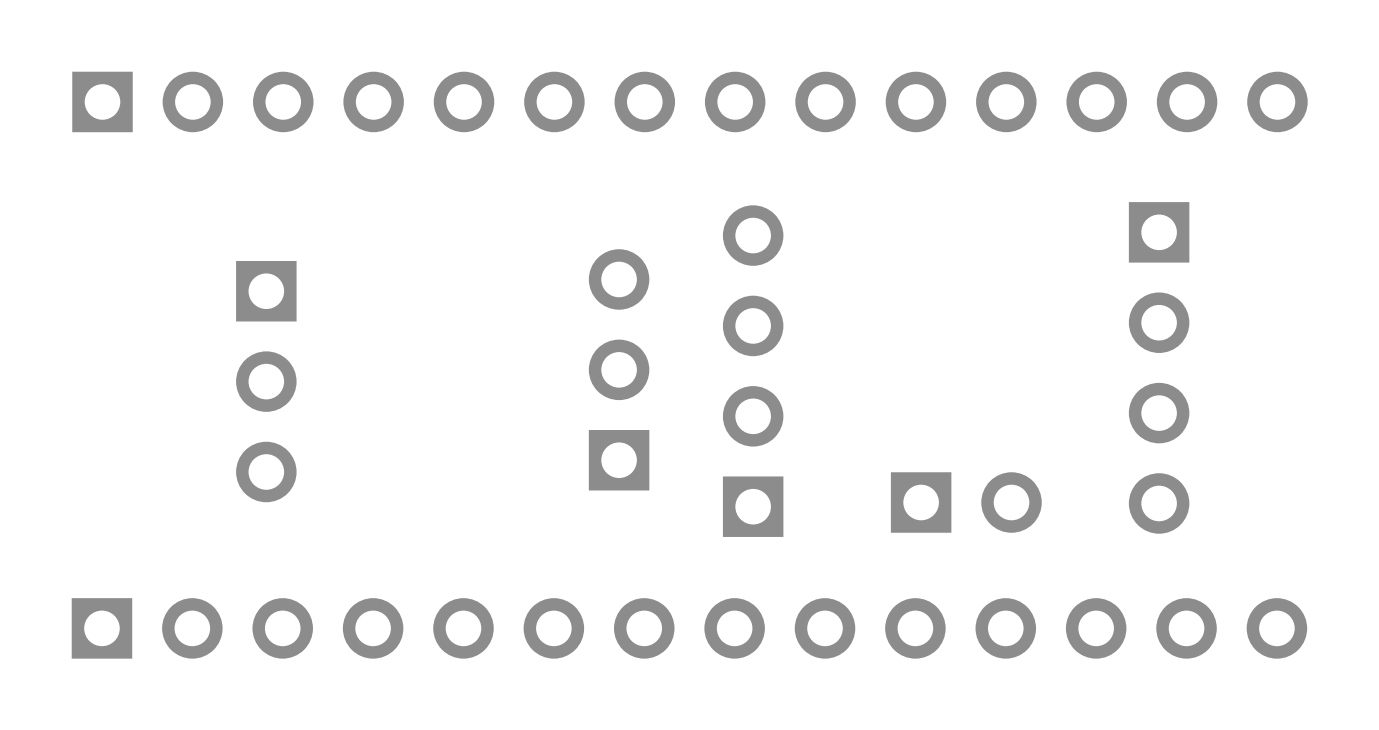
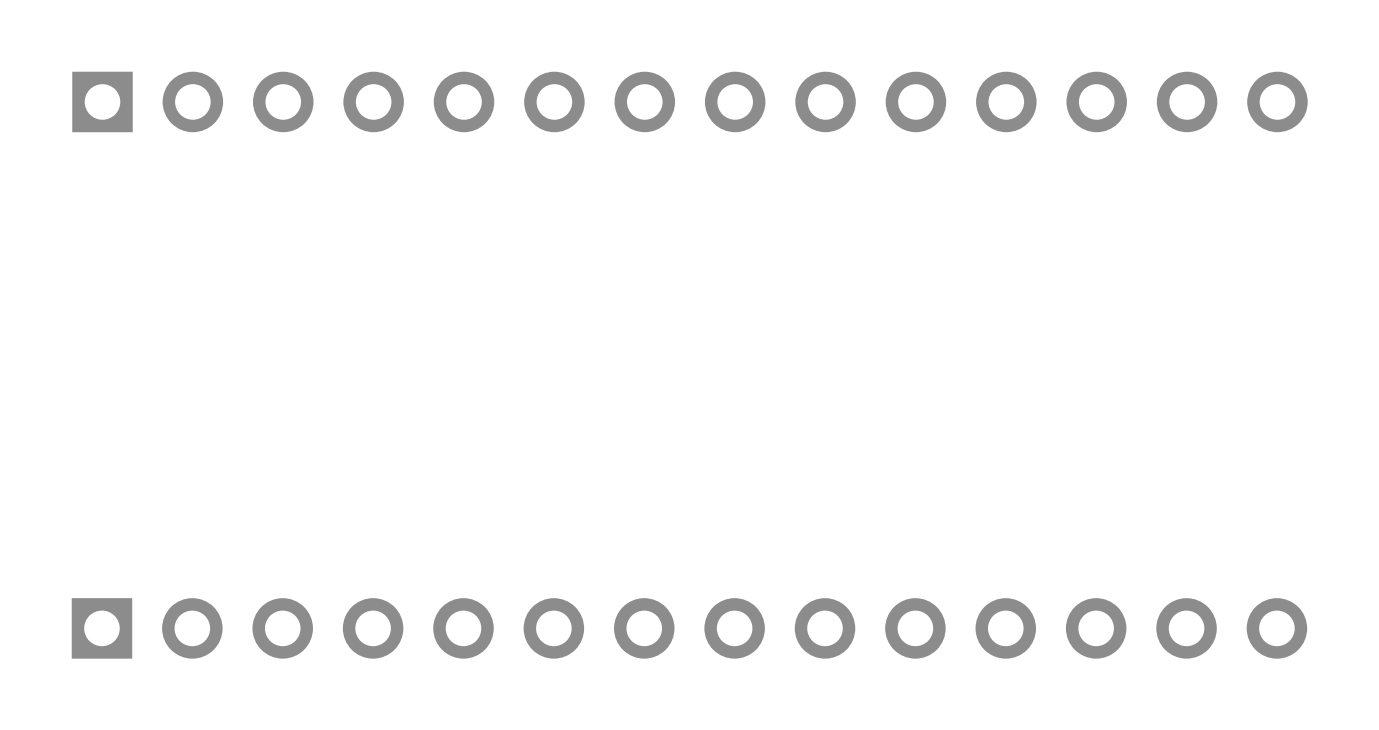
part: (1159, 367) -> none
part: (619, 369) -> none
part: (753, 371) -> none
part: (266, 381) -> none
part: (966, 502) -> none

